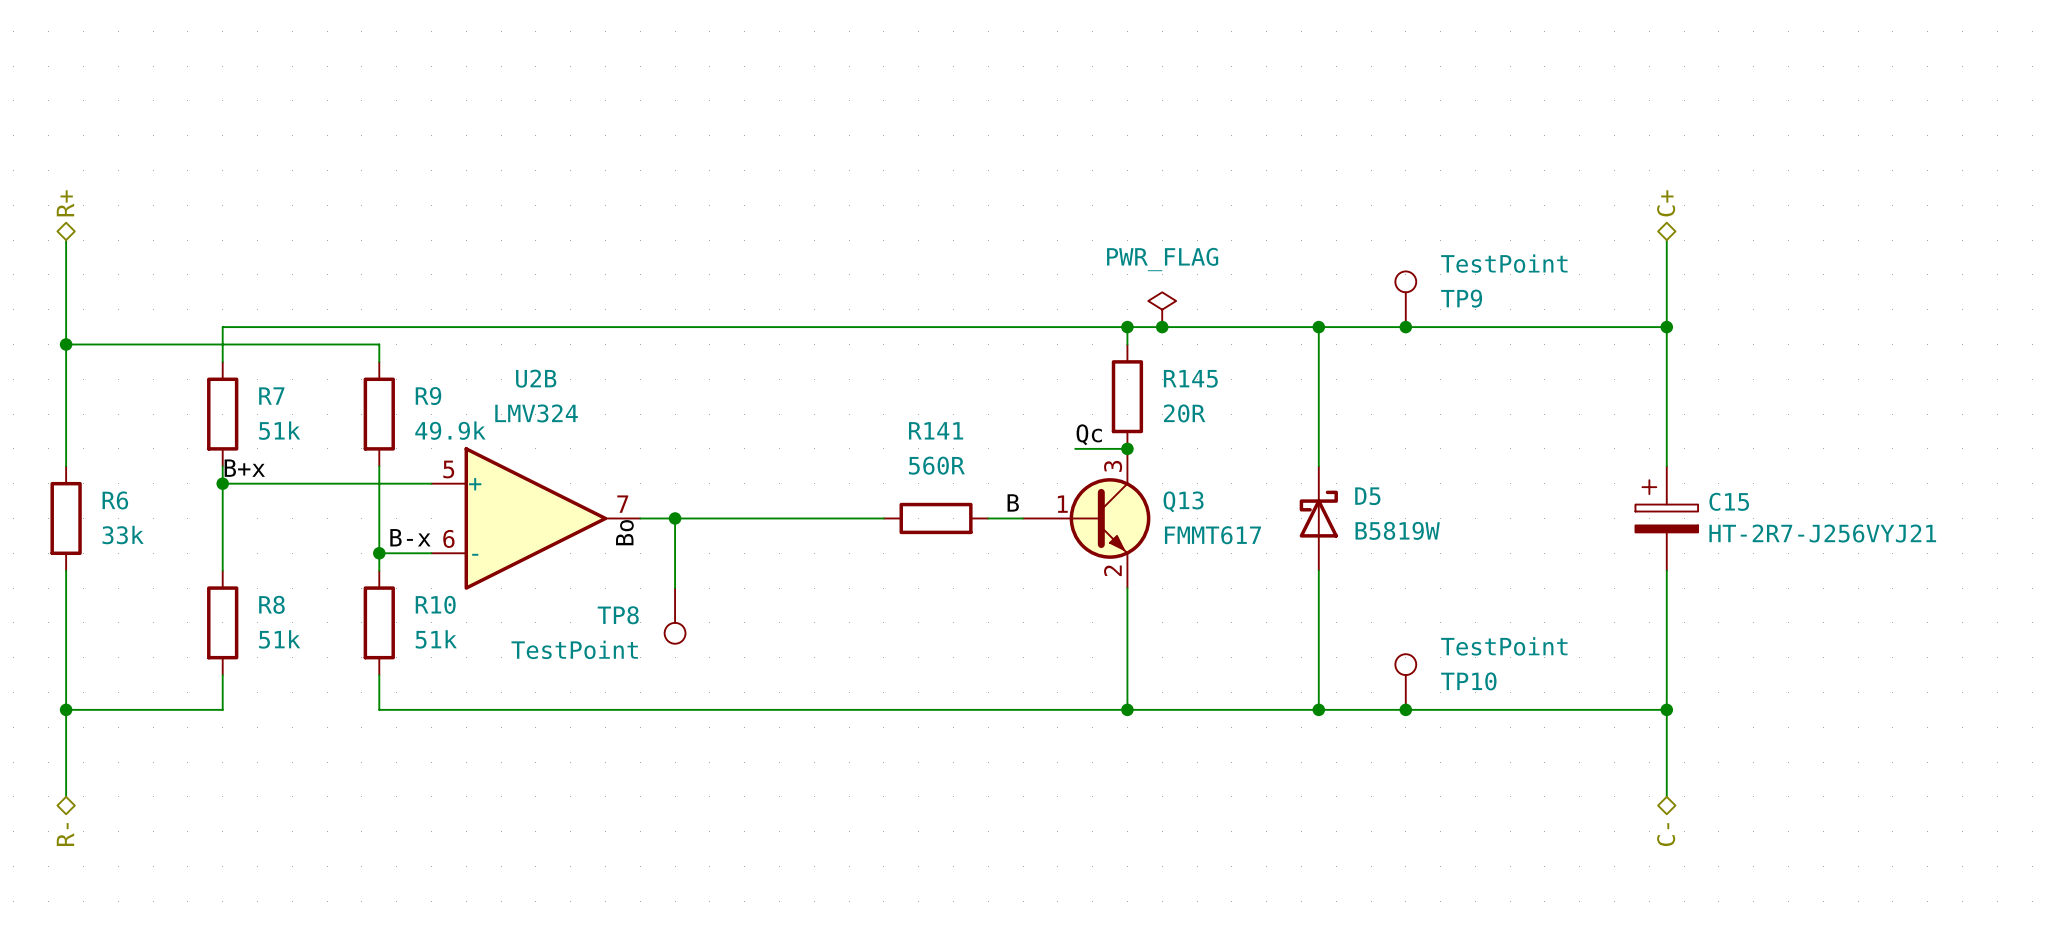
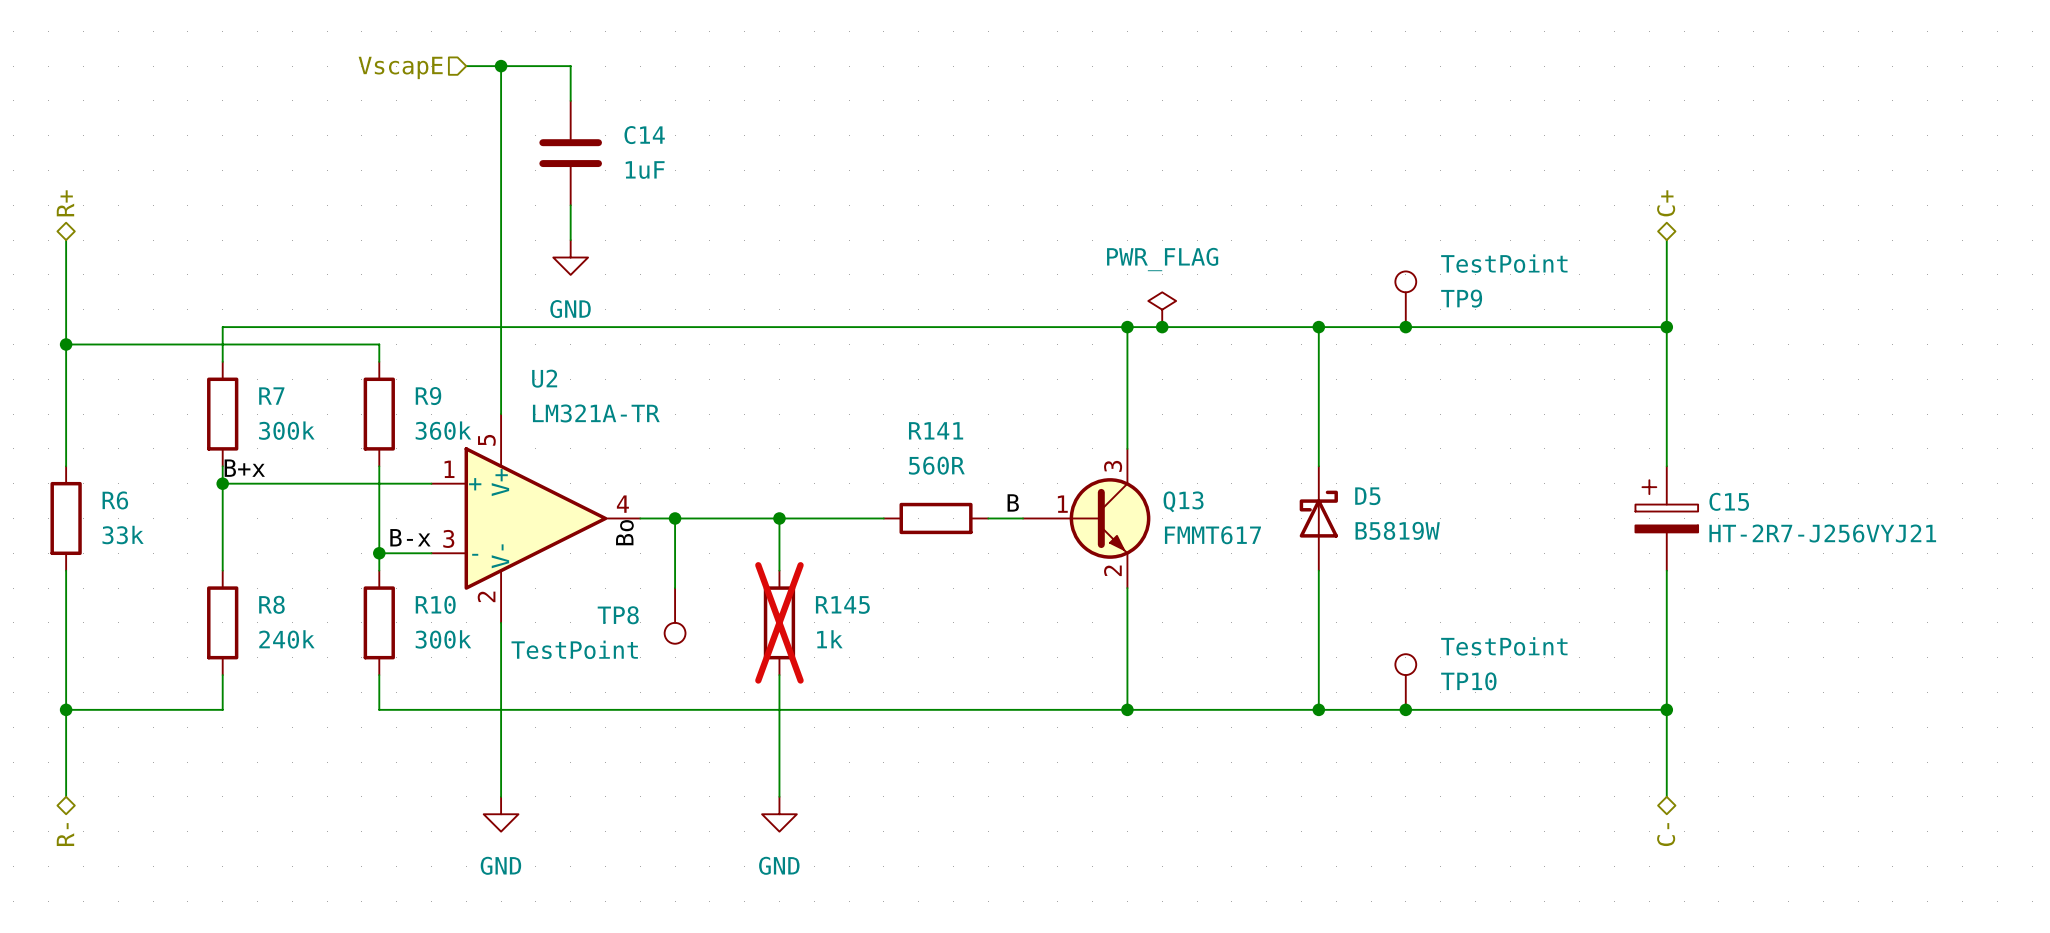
wire: none -> (466, 66) (570, 66) (570, 100)
wire: none -> (501, 66) (501, 414)
junction: none -> (501, 66)
hierarchical label: none -> VscapE (400, 67)
C14: none -> 1uF (570, 153)
wire: none -> (570, 205) (570, 240)
power symbol: none -> GND (570, 257)
R145 position: (1127, 396) -> (779, 622)
R145 value: 20R (1184, 413) -> 1k (829, 639)
R7 value: 51k (279, 430) -> 300k (286, 430)
R9 value: 49.9k (450, 430) -> 360k (443, 430)
label: Qc (1089, 434) -> none
wire: (1075, 448) (1127, 448) -> (1127, 344) (1127, 448)
junction: (1127, 448) -> none
U2B: LMV324 (535, 518) -> none
U2: none -> LM321A-TR (535, 518)
wire: none -> (779, 518) (779, 570)
junction: none -> (779, 518)
wire: none -> (501, 622) (501, 796)
R145 do-not-place cross: none -> (779, 622)
R8 value: 51k (279, 639) -> 240k (286, 639)
R10 value: 51k (436, 639) -> 300k (443, 639)
wire: none -> (779, 675) (779, 796)
power symbol: none -> GND (501, 814)
power symbol: none -> GND (779, 814)

